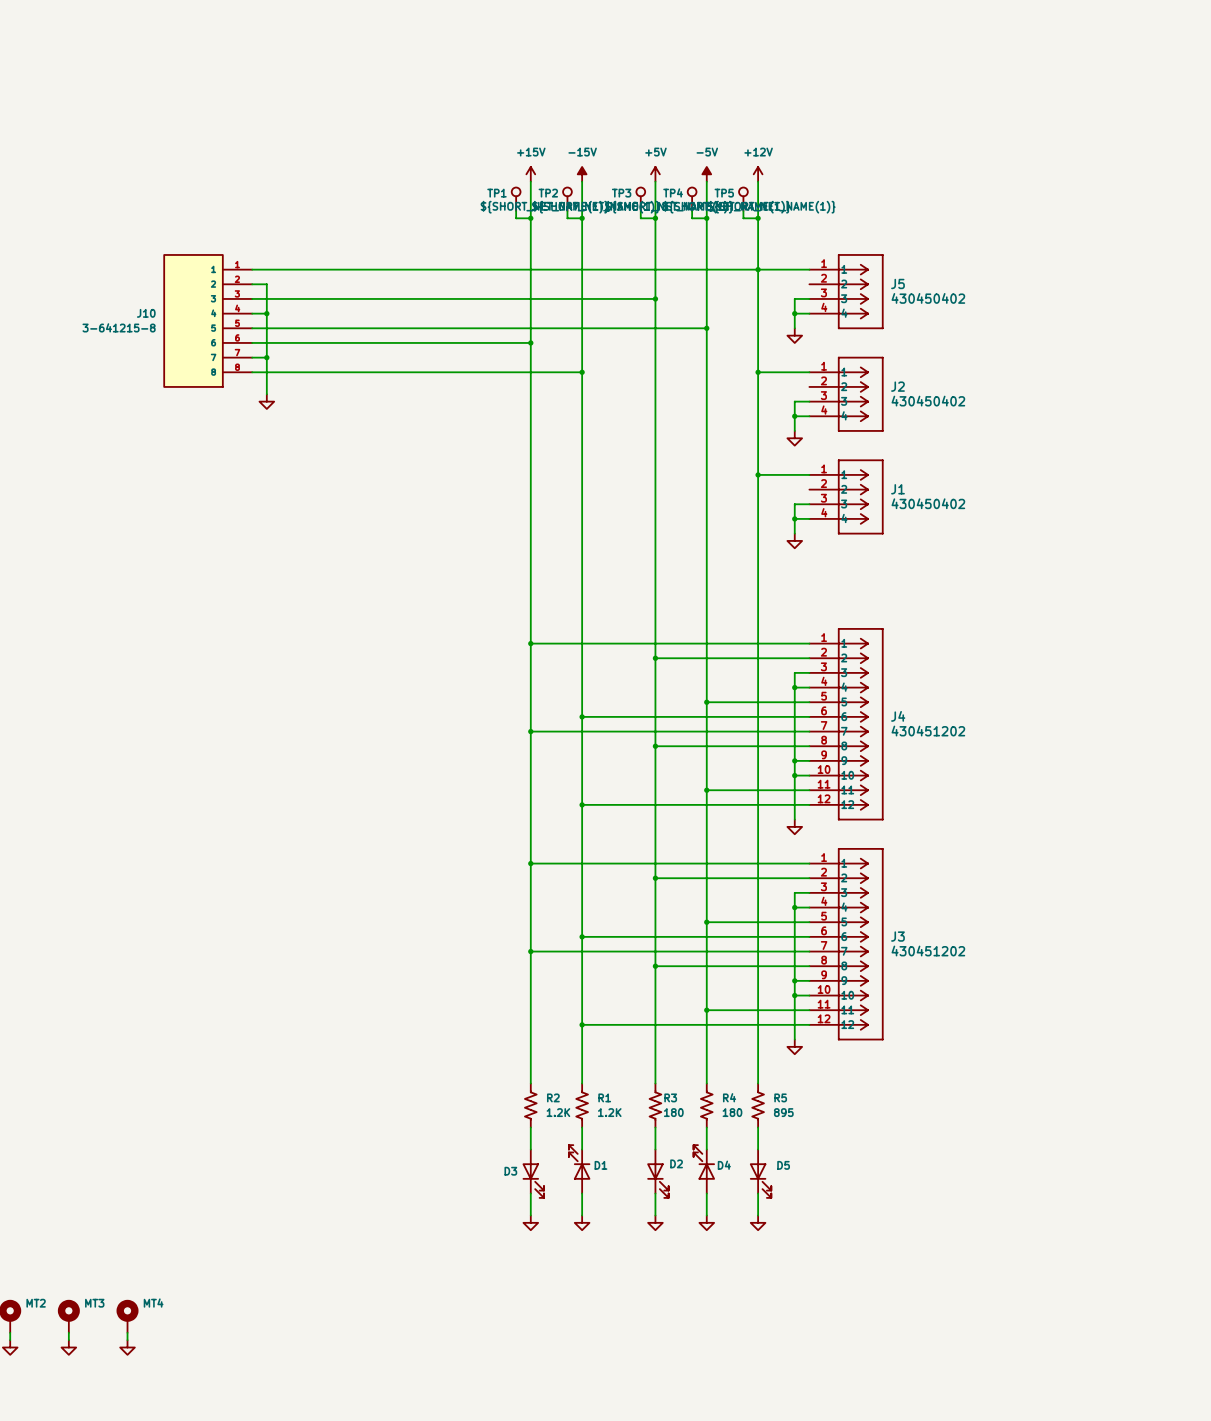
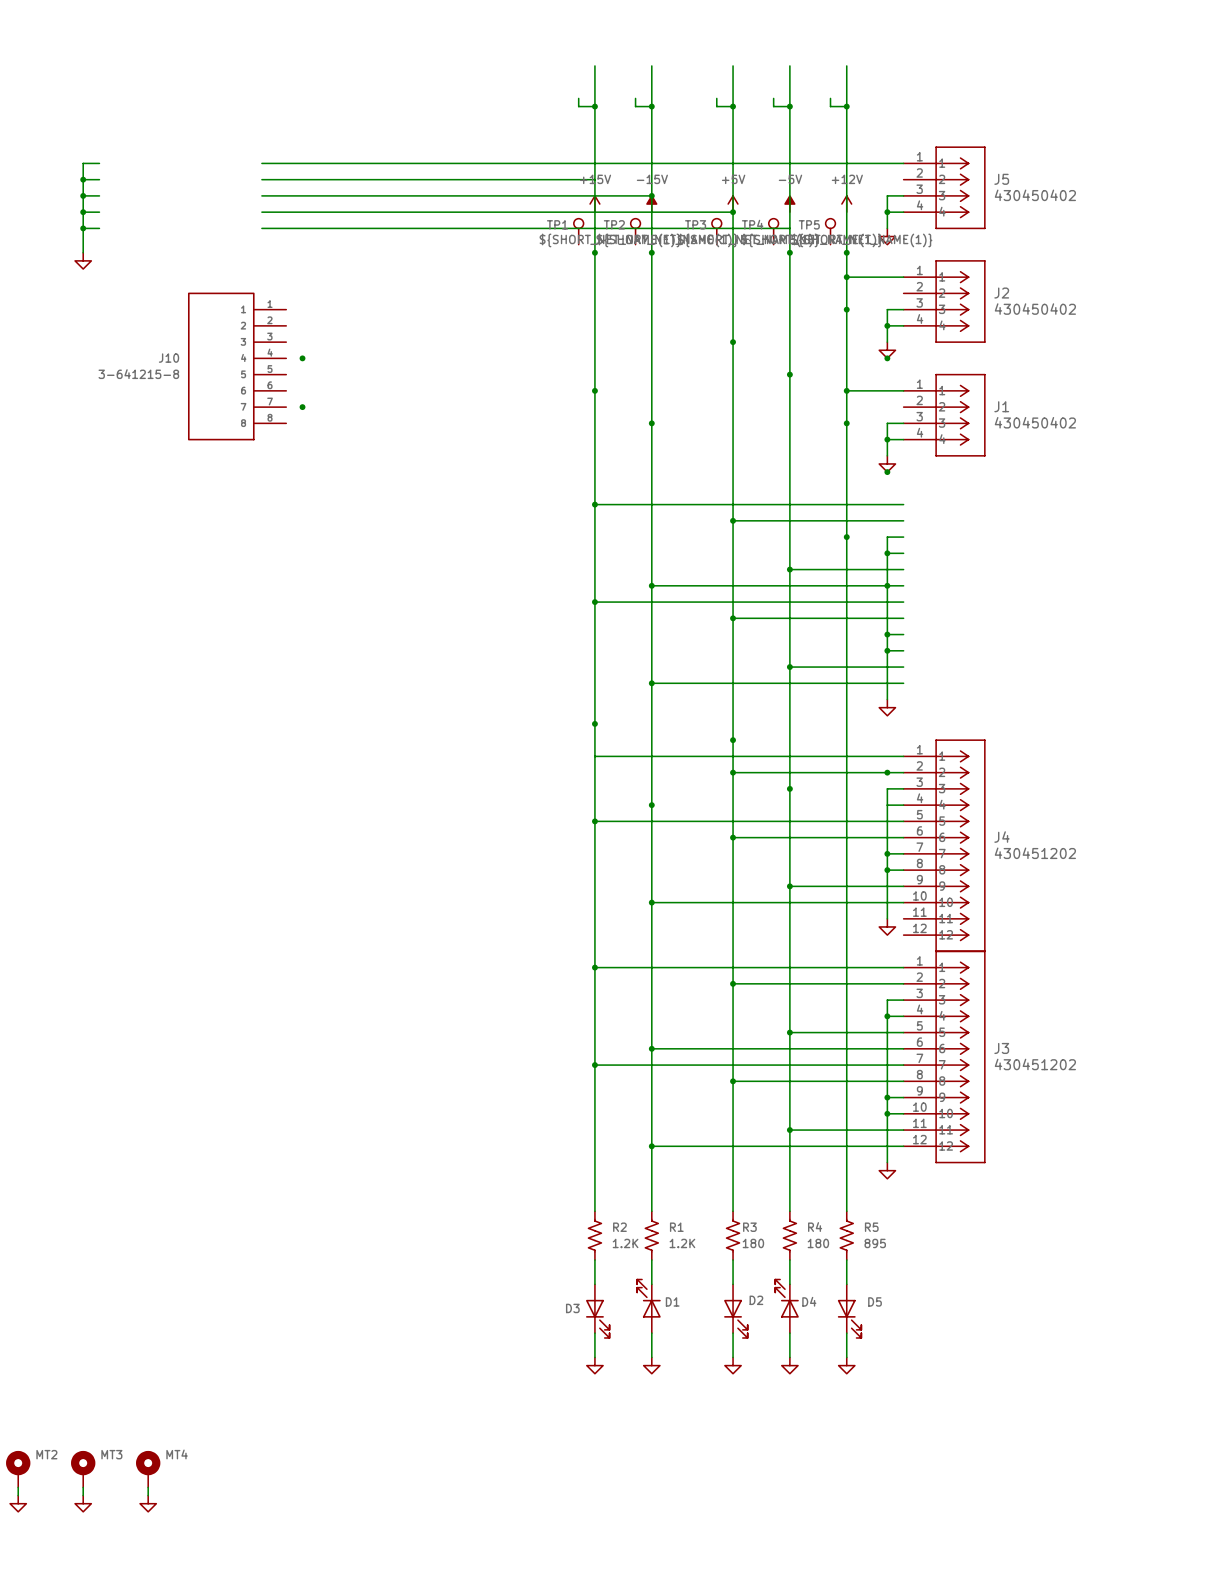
wire: none -> (594, 65) (594, 212)
wire: none -> (651, 65) (651, 212)
wire: none -> (733, 65) (733, 212) (261, 212)
wire: none -> (789, 65) (789, 212)
wire: none -> (846, 65) (846, 212)
junction: none -> (594, 106)
junction: none -> (651, 106)
junction: none -> (733, 106)
junction: none -> (789, 106)
junction: none -> (846, 106)
wire: none -> (99, 163) (83, 163) (83, 252)
wire: none -> (261, 163) (903, 163)
wire: none -> (83, 179) (99, 179)
junction: none -> (83, 179)
wire: none -> (261, 179) (594, 179)
wire: none -> (83, 195) (99, 195)
junction: none -> (83, 195)
wire: none -> (261, 195) (651, 195)
junction: none -> (651, 195)
wire: none -> (83, 212) (99, 212)
junction: none -> (83, 212)
junction: none -> (733, 212)
junction: none -> (887, 212)
wire: none -> (83, 228) (99, 228)
junction: none -> (83, 228)
wire: none -> (261, 228) (789, 228)
power symbol: none -> (887, 236)
wire: (516, 210) (516, 218) (530, 218) -> (578, 98) (578, 106) (594, 106)
wire: (567, 210) (567, 218) (582, 218) -> (635, 98) (635, 106) (651, 106)
wire: (640, 210) (640, 218) (655, 218) -> (716, 98) (716, 106) (733, 106)
wire: (692, 210) (692, 218) (706, 218) -> (773, 98) (773, 106) (789, 106)
wire: (743, 210) (743, 218) (758, 218) -> (830, 98) (830, 106) (846, 106)
junction: (655, 218) -> none
power symbol: none -> (83, 260)
wire: none -> (846, 277) (903, 277)
junction: none -> (846, 277)
wire: (252, 269) (794, 269) -> (887, 342) (887, 309)
wire: (252, 284) (266, 284) (266, 394) -> none
junction: none -> (887, 325)
J5 position: (846, 291) -> (944, 187)
wire: (252, 298) (655, 298) -> none
wire: (809, 298) (794, 298) (794, 328) -> (903, 195) (887, 195) (887, 228)
wire: (252, 313) (266, 313) -> none
wire: (794, 313) (809, 313) -> (887, 212) (903, 212)
wire: (252, 328) (706, 328) -> none
power symbol position: (794, 335) -> (887, 350)
wire: (252, 342) (530, 342) -> none
wire: none -> (846, 390) (903, 390)
junction: none -> (846, 390)
wire: (252, 357) (266, 357) -> none
wire: (252, 372) (582, 372) -> none
wire: (758, 372) (794, 372) -> (887, 455) (887, 423)
wire: none -> (887, 439) (903, 439)
junction: none -> (887, 439)
J2 position: (846, 394) -> (944, 301)
power symbol: (266, 401) -> none
wire: (809, 401) (794, 401) (794, 430) -> none
wire: (794, 416) (809, 416) -> (887, 325) (903, 325)
power symbol position: (794, 438) -> (887, 463)
wire: none -> (594, 504) (903, 504)
junction: none -> (594, 504)
wire: none -> (733, 520) (903, 520)
junction: none -> (733, 520)
wire: (758, 474) (794, 474) -> (789, 569) (887, 569) (887, 537)
wire: none -> (887, 553) (903, 553)
junction: none -> (887, 553)
J1 position: (846, 496) -> (944, 415)
junction: none -> (789, 569)
wire: none -> (651, 585) (887, 585)
junction: none -> (651, 585)
junction: none -> (594, 602)
wire: none -> (887, 602) (887, 699)
power symbol: (794, 540) -> none
junction: none -> (733, 618)
wire: none -> (887, 634) (903, 634)
junction: none -> (887, 634)
wire: none -> (887, 650) (903, 650)
junction: none -> (887, 650)
wire: none -> (789, 667) (903, 667)
junction: none -> (789, 667)
wire: none -> (651, 683) (903, 683)
junction: none -> (651, 683)
power symbol: none -> (887, 707)
wire: (530, 643) (809, 643) -> (594, 602) (903, 602)
wire: (655, 658) (809, 658) -> (733, 618) (903, 618)
wire: (794, 672) (794, 702) (706, 702) -> (887, 756) (594, 756)
wire: none -> (733, 772) (887, 772)
junction: none -> (733, 772)
wire: (582, 716) (794, 716) -> none
J4 position: (846, 724) -> (944, 845)

